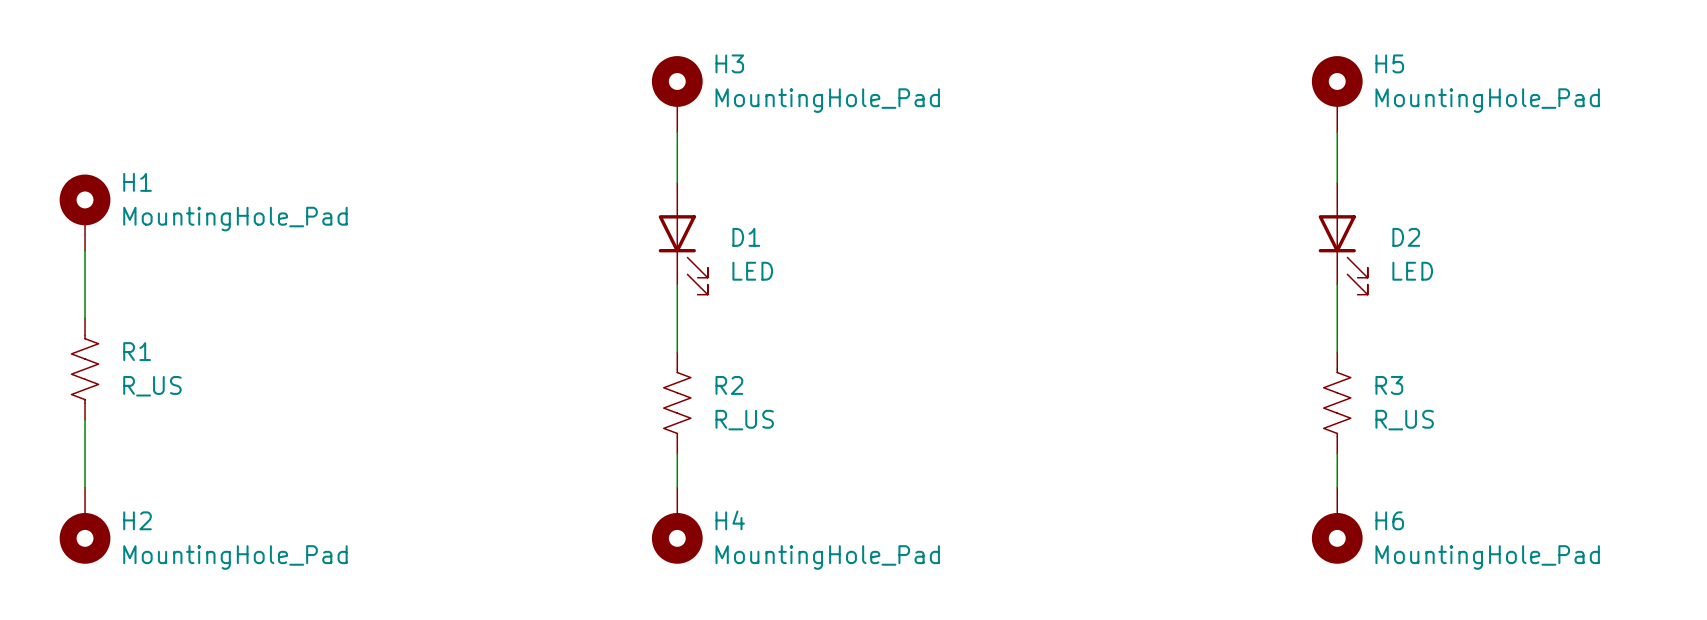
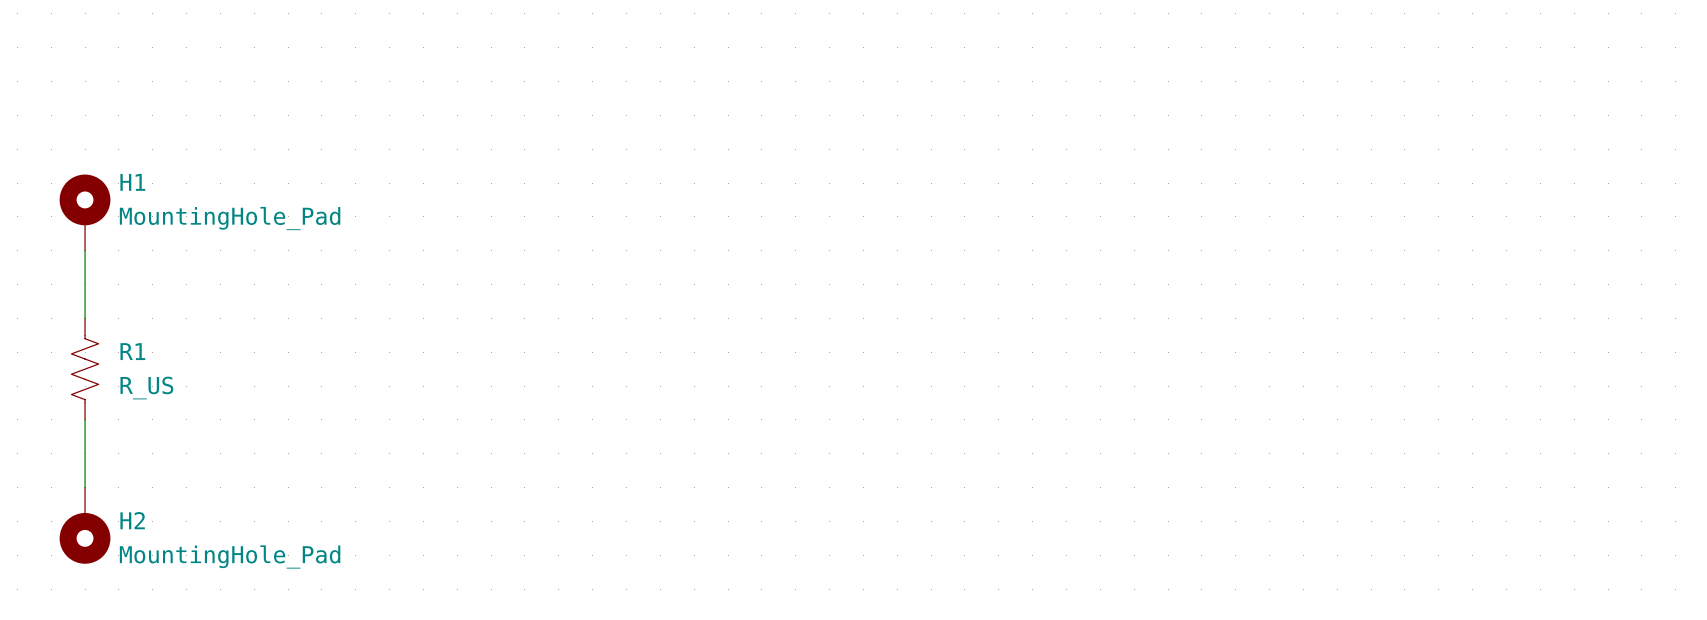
H3: MountingHole_Pad (677, 94) -> none
H5: MountingHole_Pad (1337, 94) -> none
wire: (677, 132) (677, 183) -> none
wire: (1337, 132) (1337, 183) -> none
D1: LED (683, 238) -> none
D2: LED (1343, 238) -> none
wire: (677, 284) (677, 352) -> none
wire: (1337, 284) (1337, 352) -> none
R2: R_US (677, 402) -> none
R3: R_US (1337, 402) -> none
wire: (677, 453) (677, 487) -> none
wire: (1337, 453) (1337, 487) -> none
H4: MountingHole_Pad (677, 525) -> none
H6: MountingHole_Pad (1337, 525) -> none

